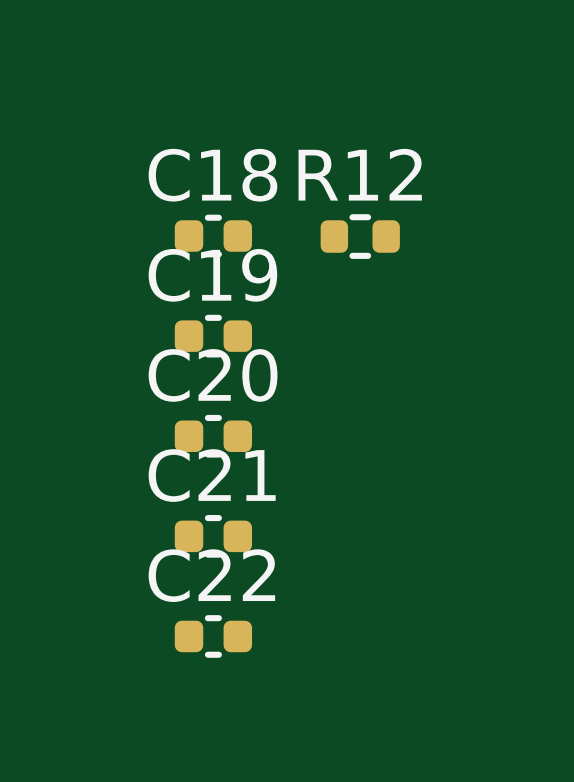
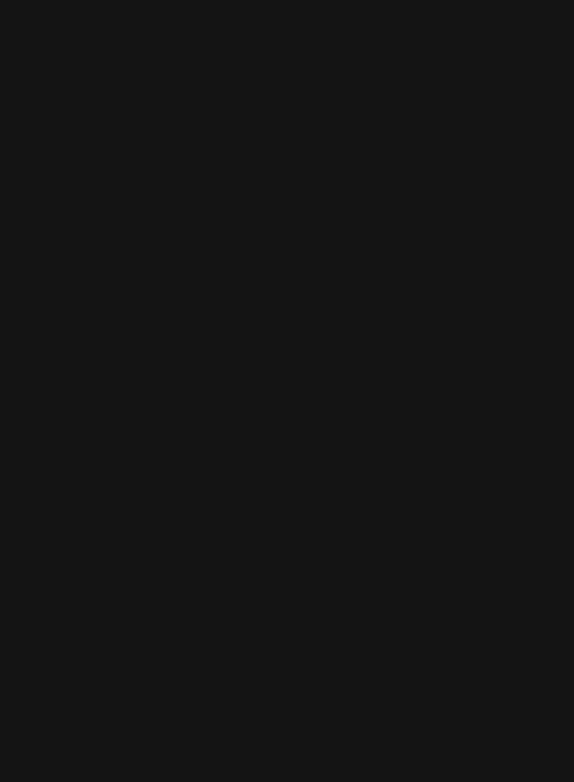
C18: (213, 236) -> none
R12: (360, 236) -> none
C19: (213, 336) -> none
C20: (213, 436) -> none
C21: (213, 536) -> none
C22: (213, 636) -> none

